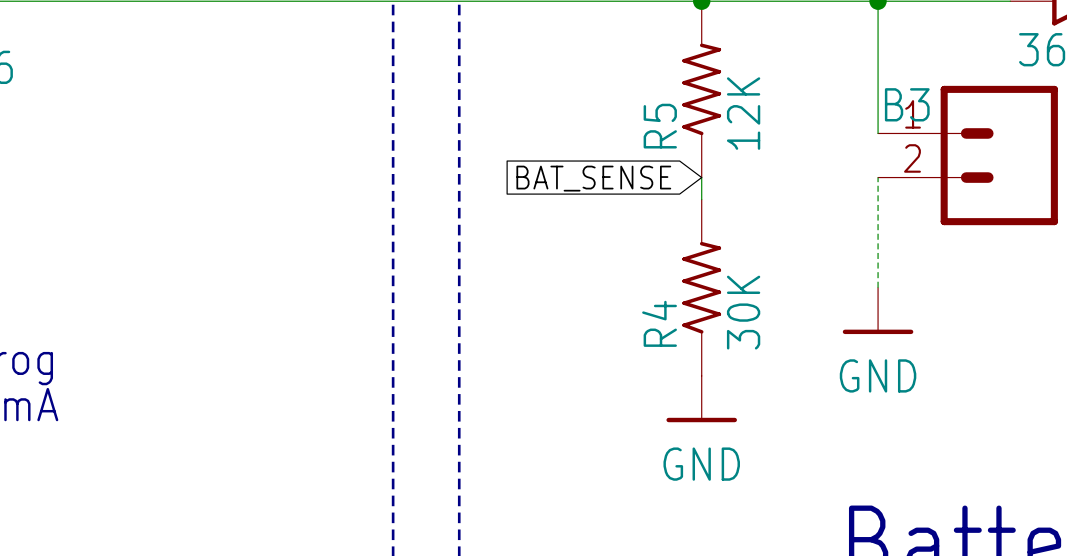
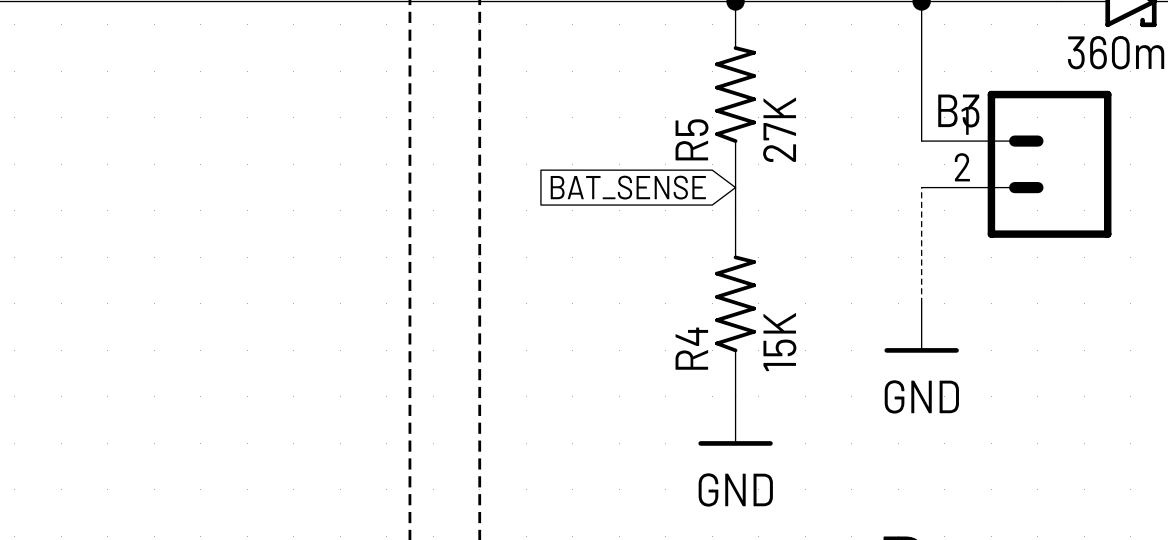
R5 value: 12K (743, 113) -> 27K (779, 129)
R4 value: 30K (743, 312) -> 15K (779, 342)

